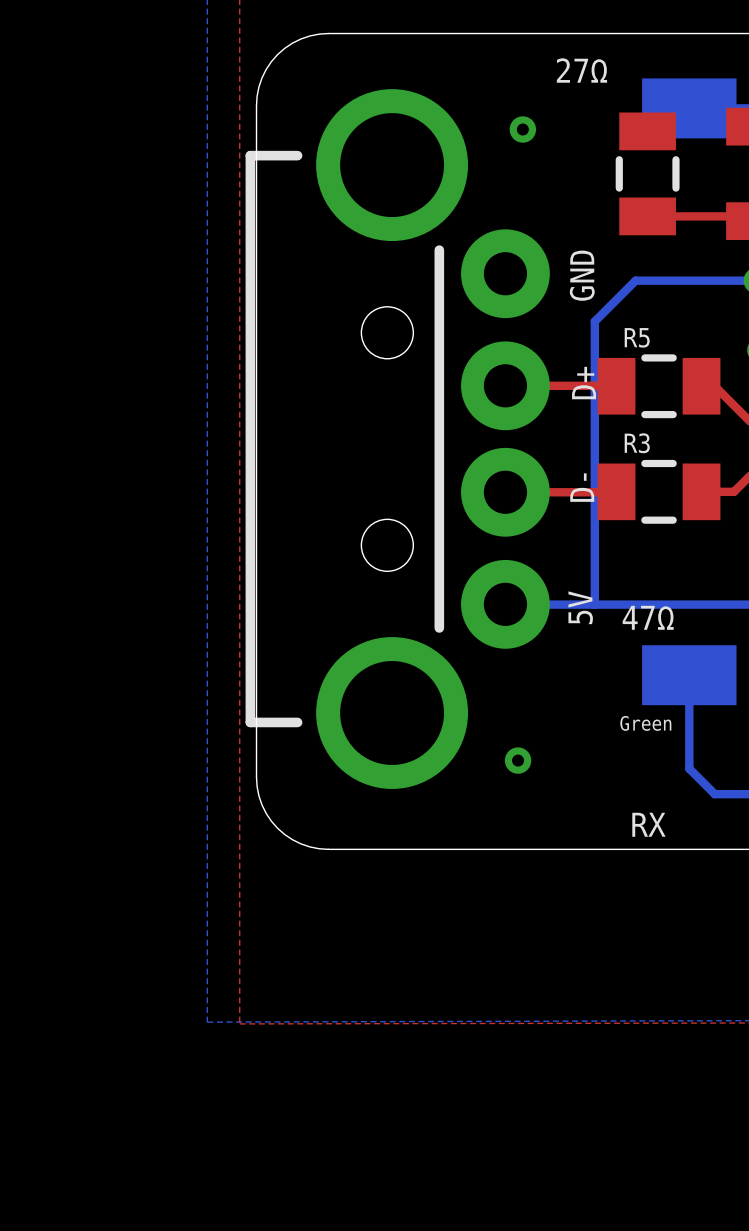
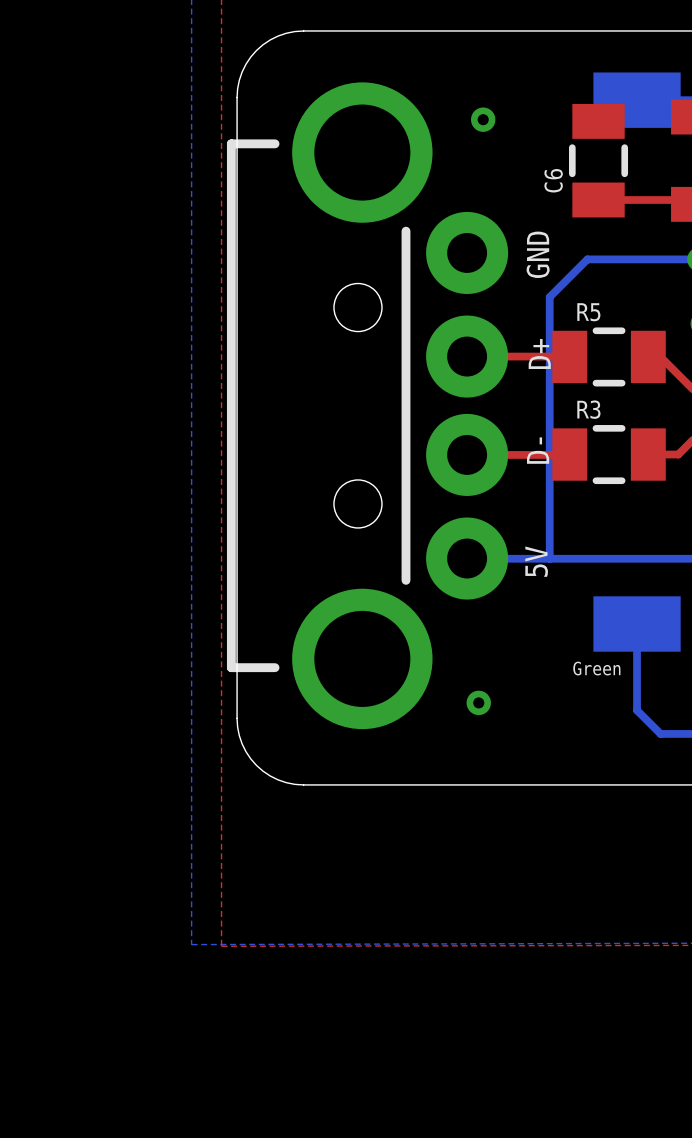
text: 27Ω (581, 70) -> none
C6 name: none -> C6 (553, 180)
text: 47Ω (648, 617) -> none
text: RX (648, 824) -> none

